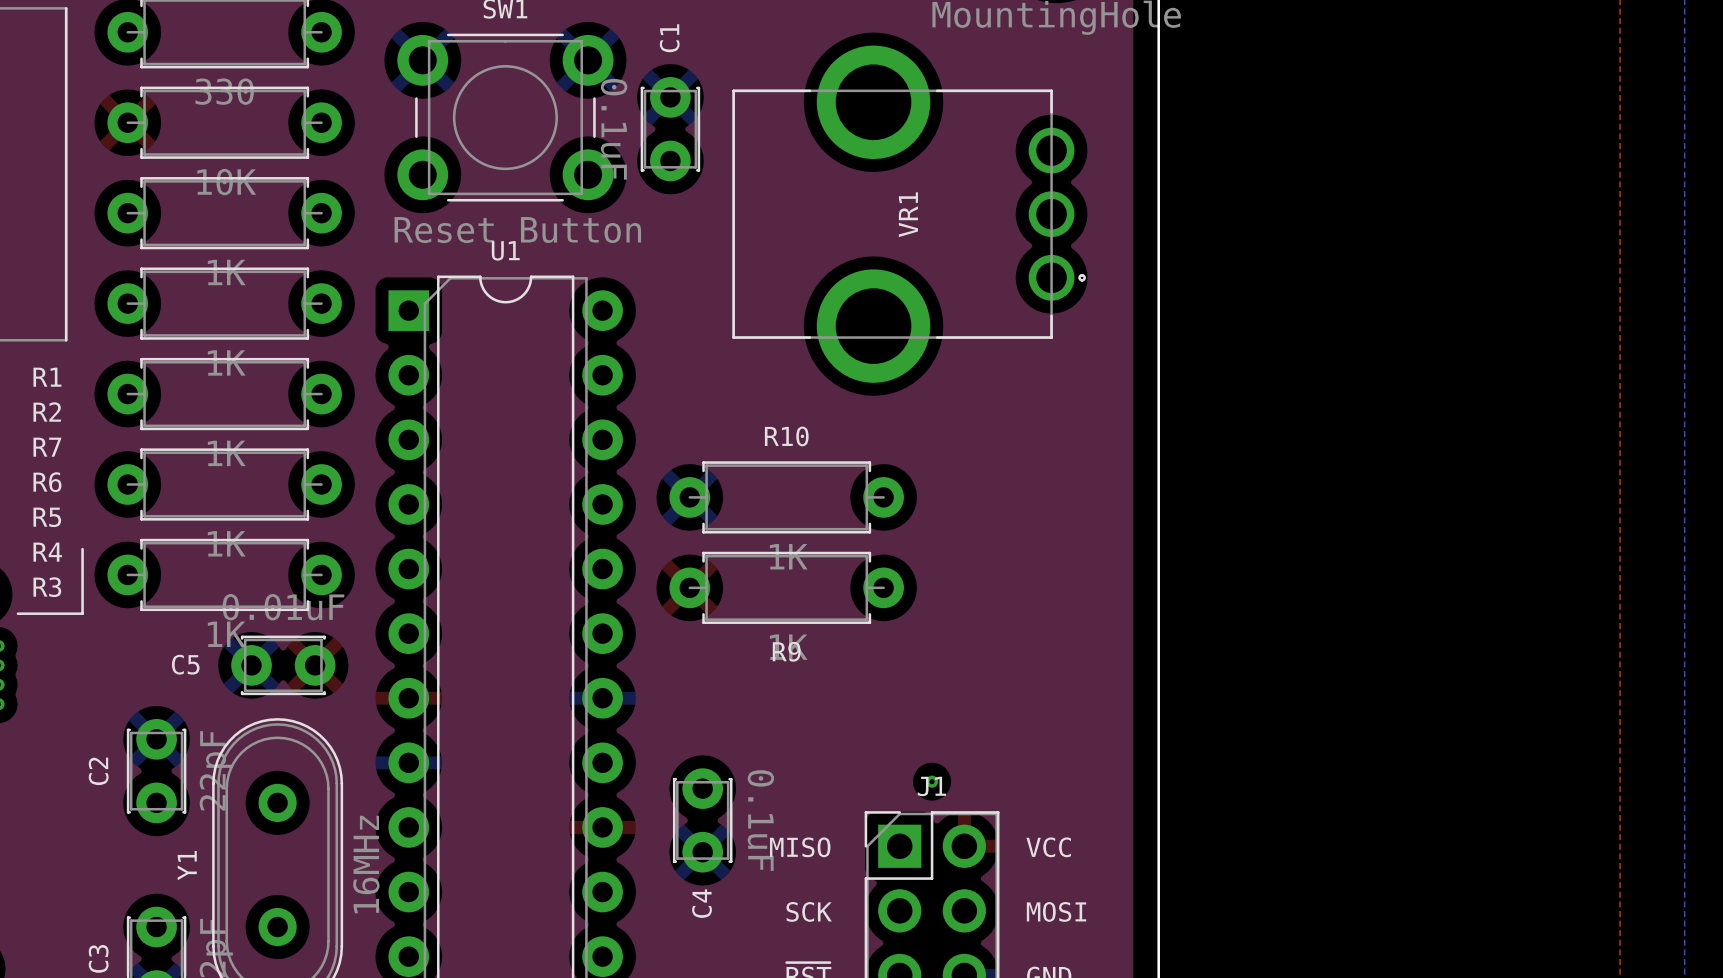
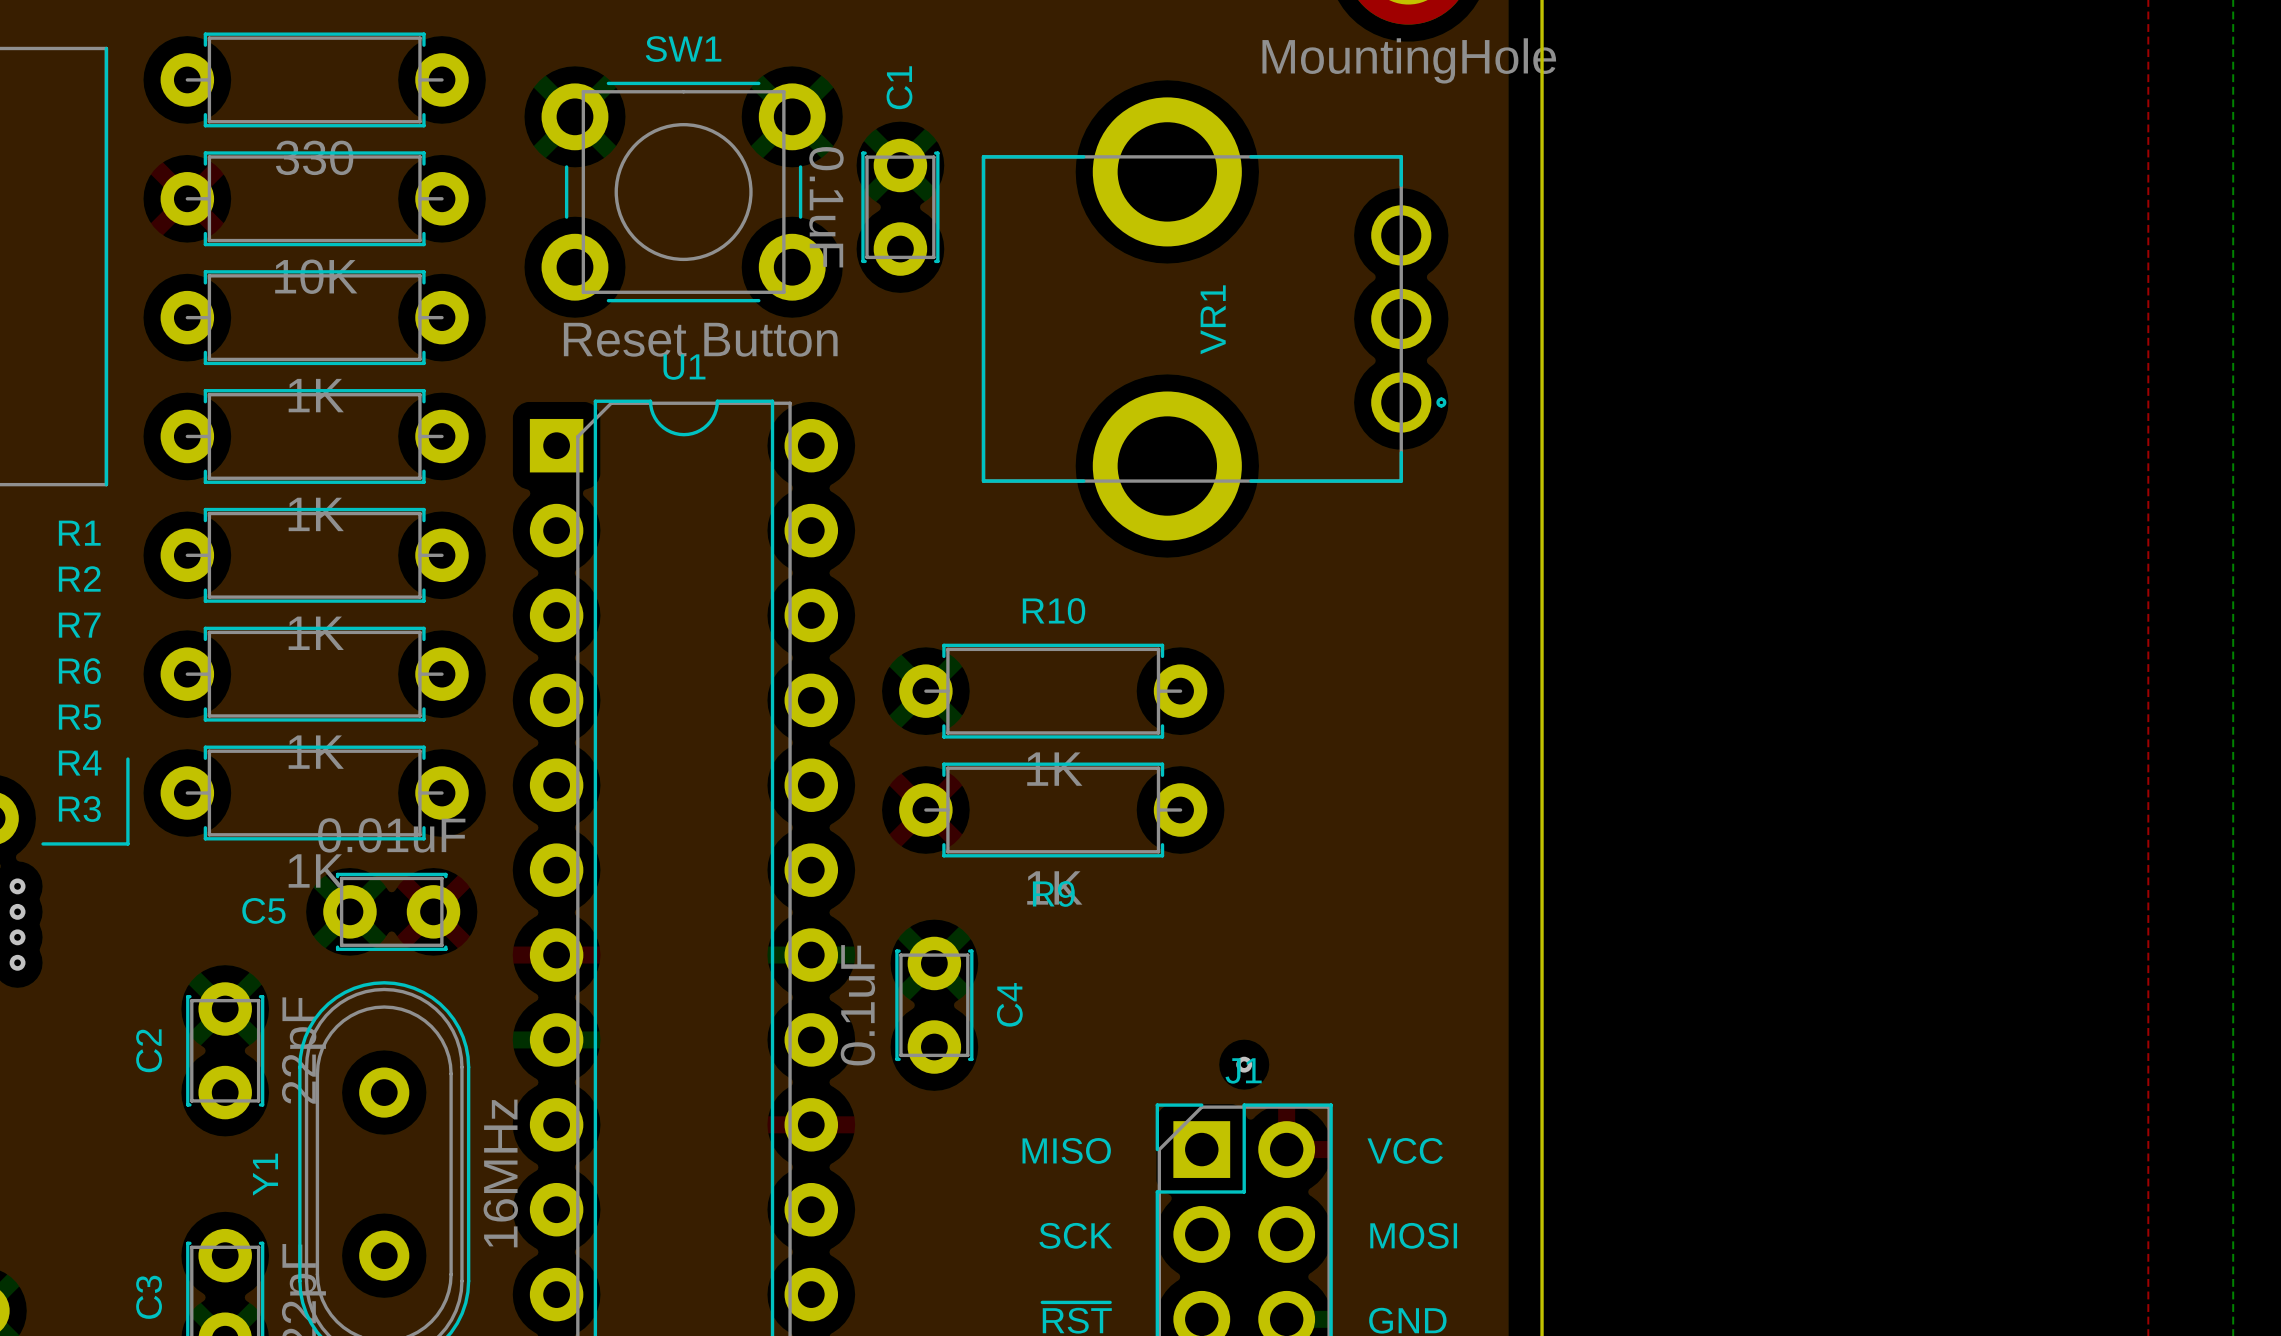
C4 position: (702, 820) -> (934, 1005)
C4 value rotation: 0° (760, 820) -> 180° (857, 1005)
C4 name position: C4 (702, 903) -> C4 (1009, 1004)

